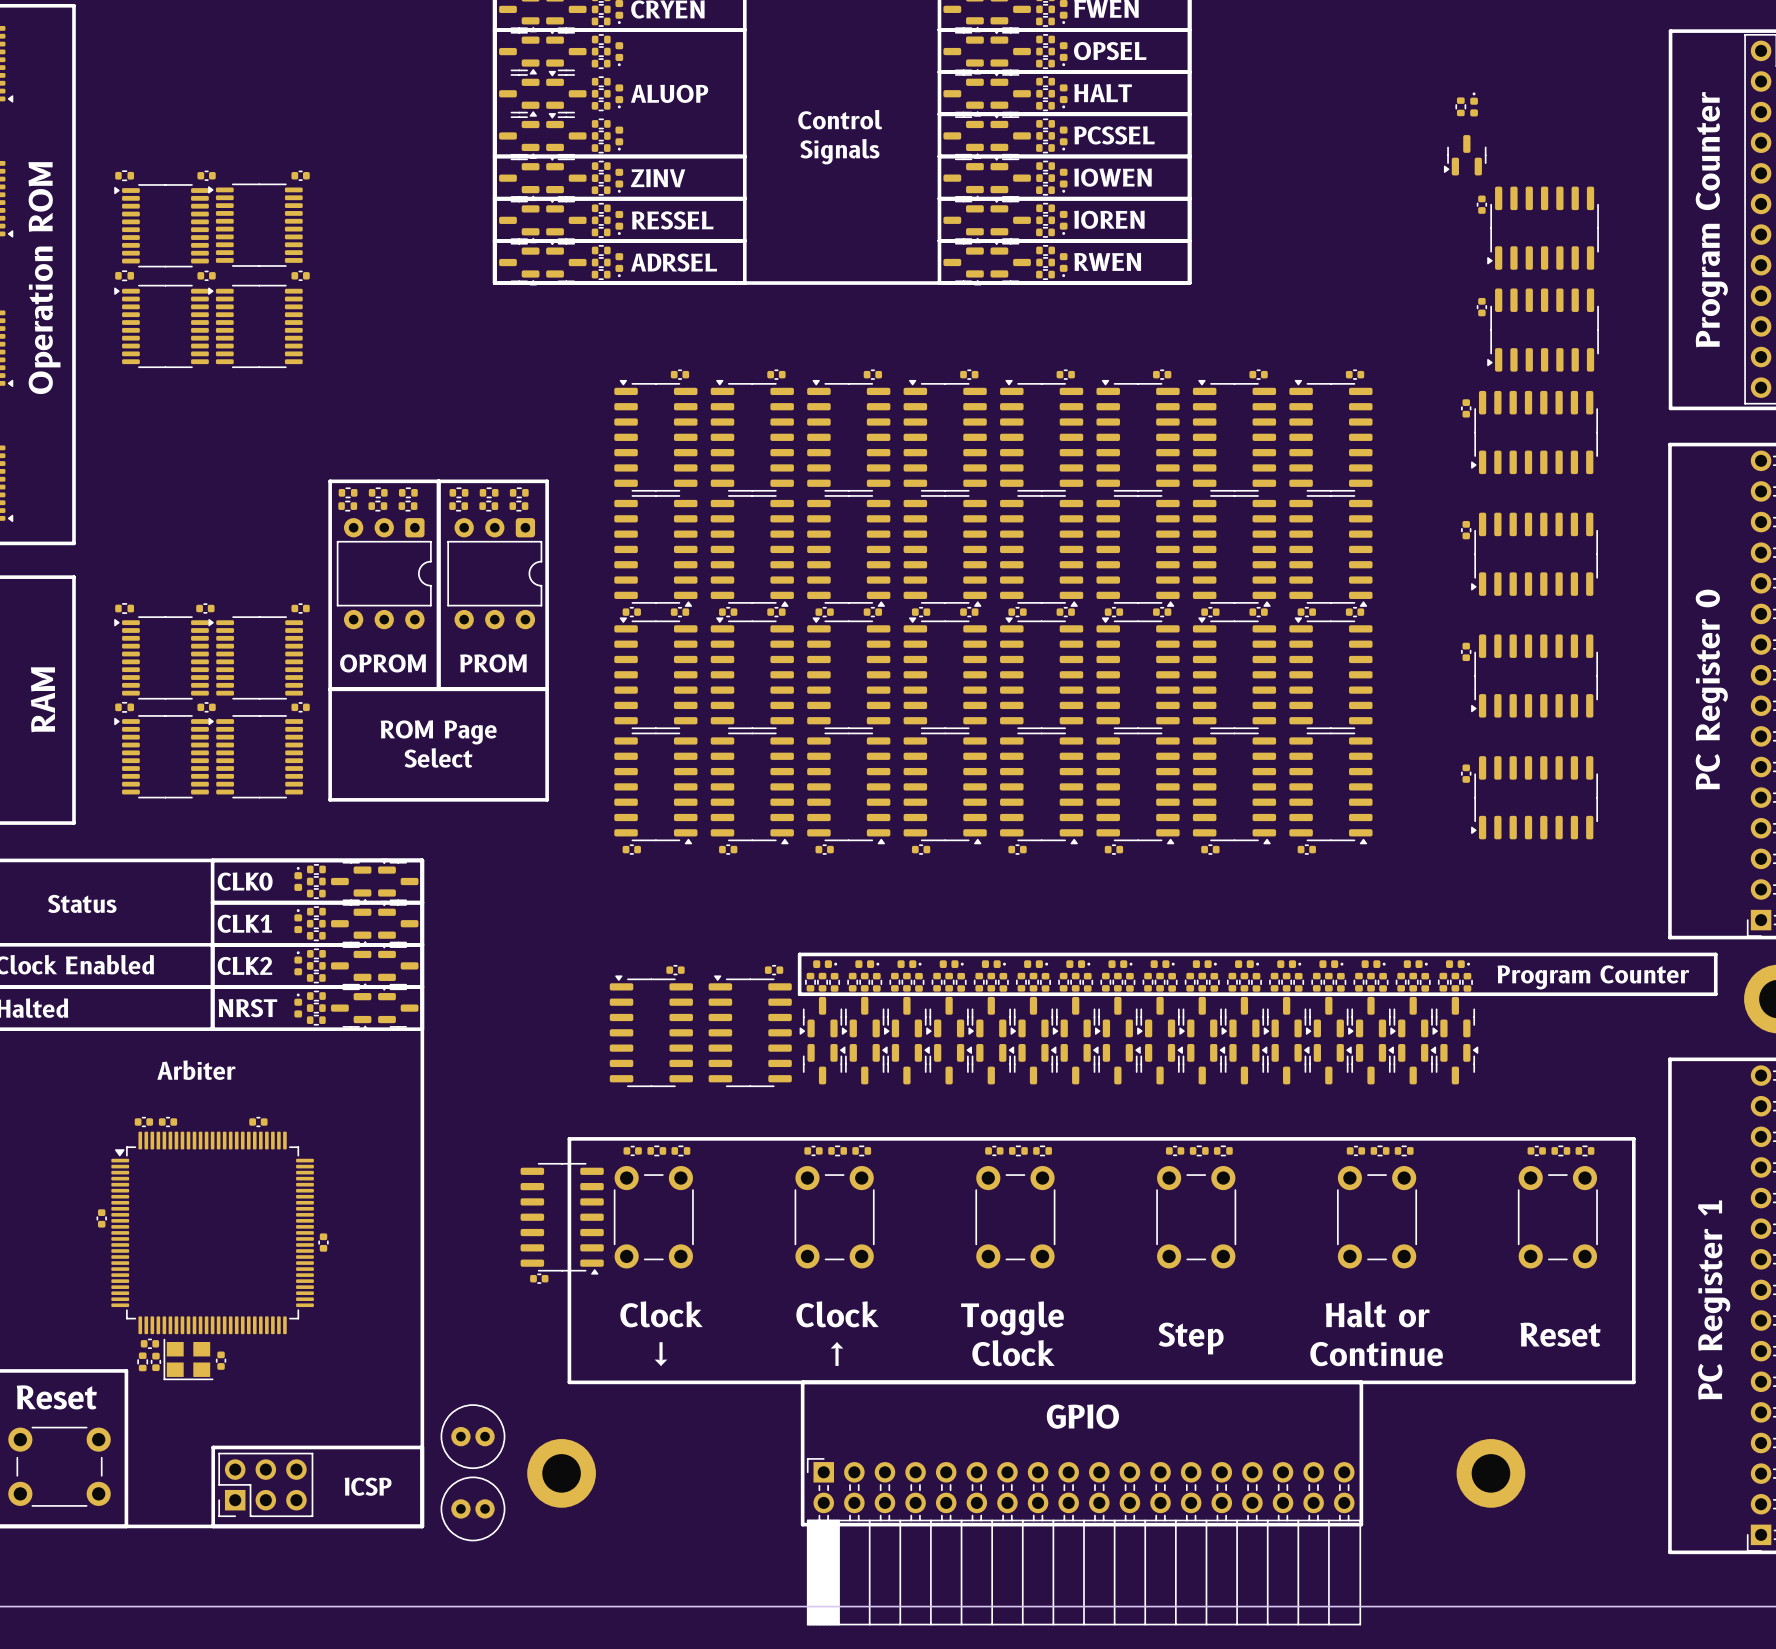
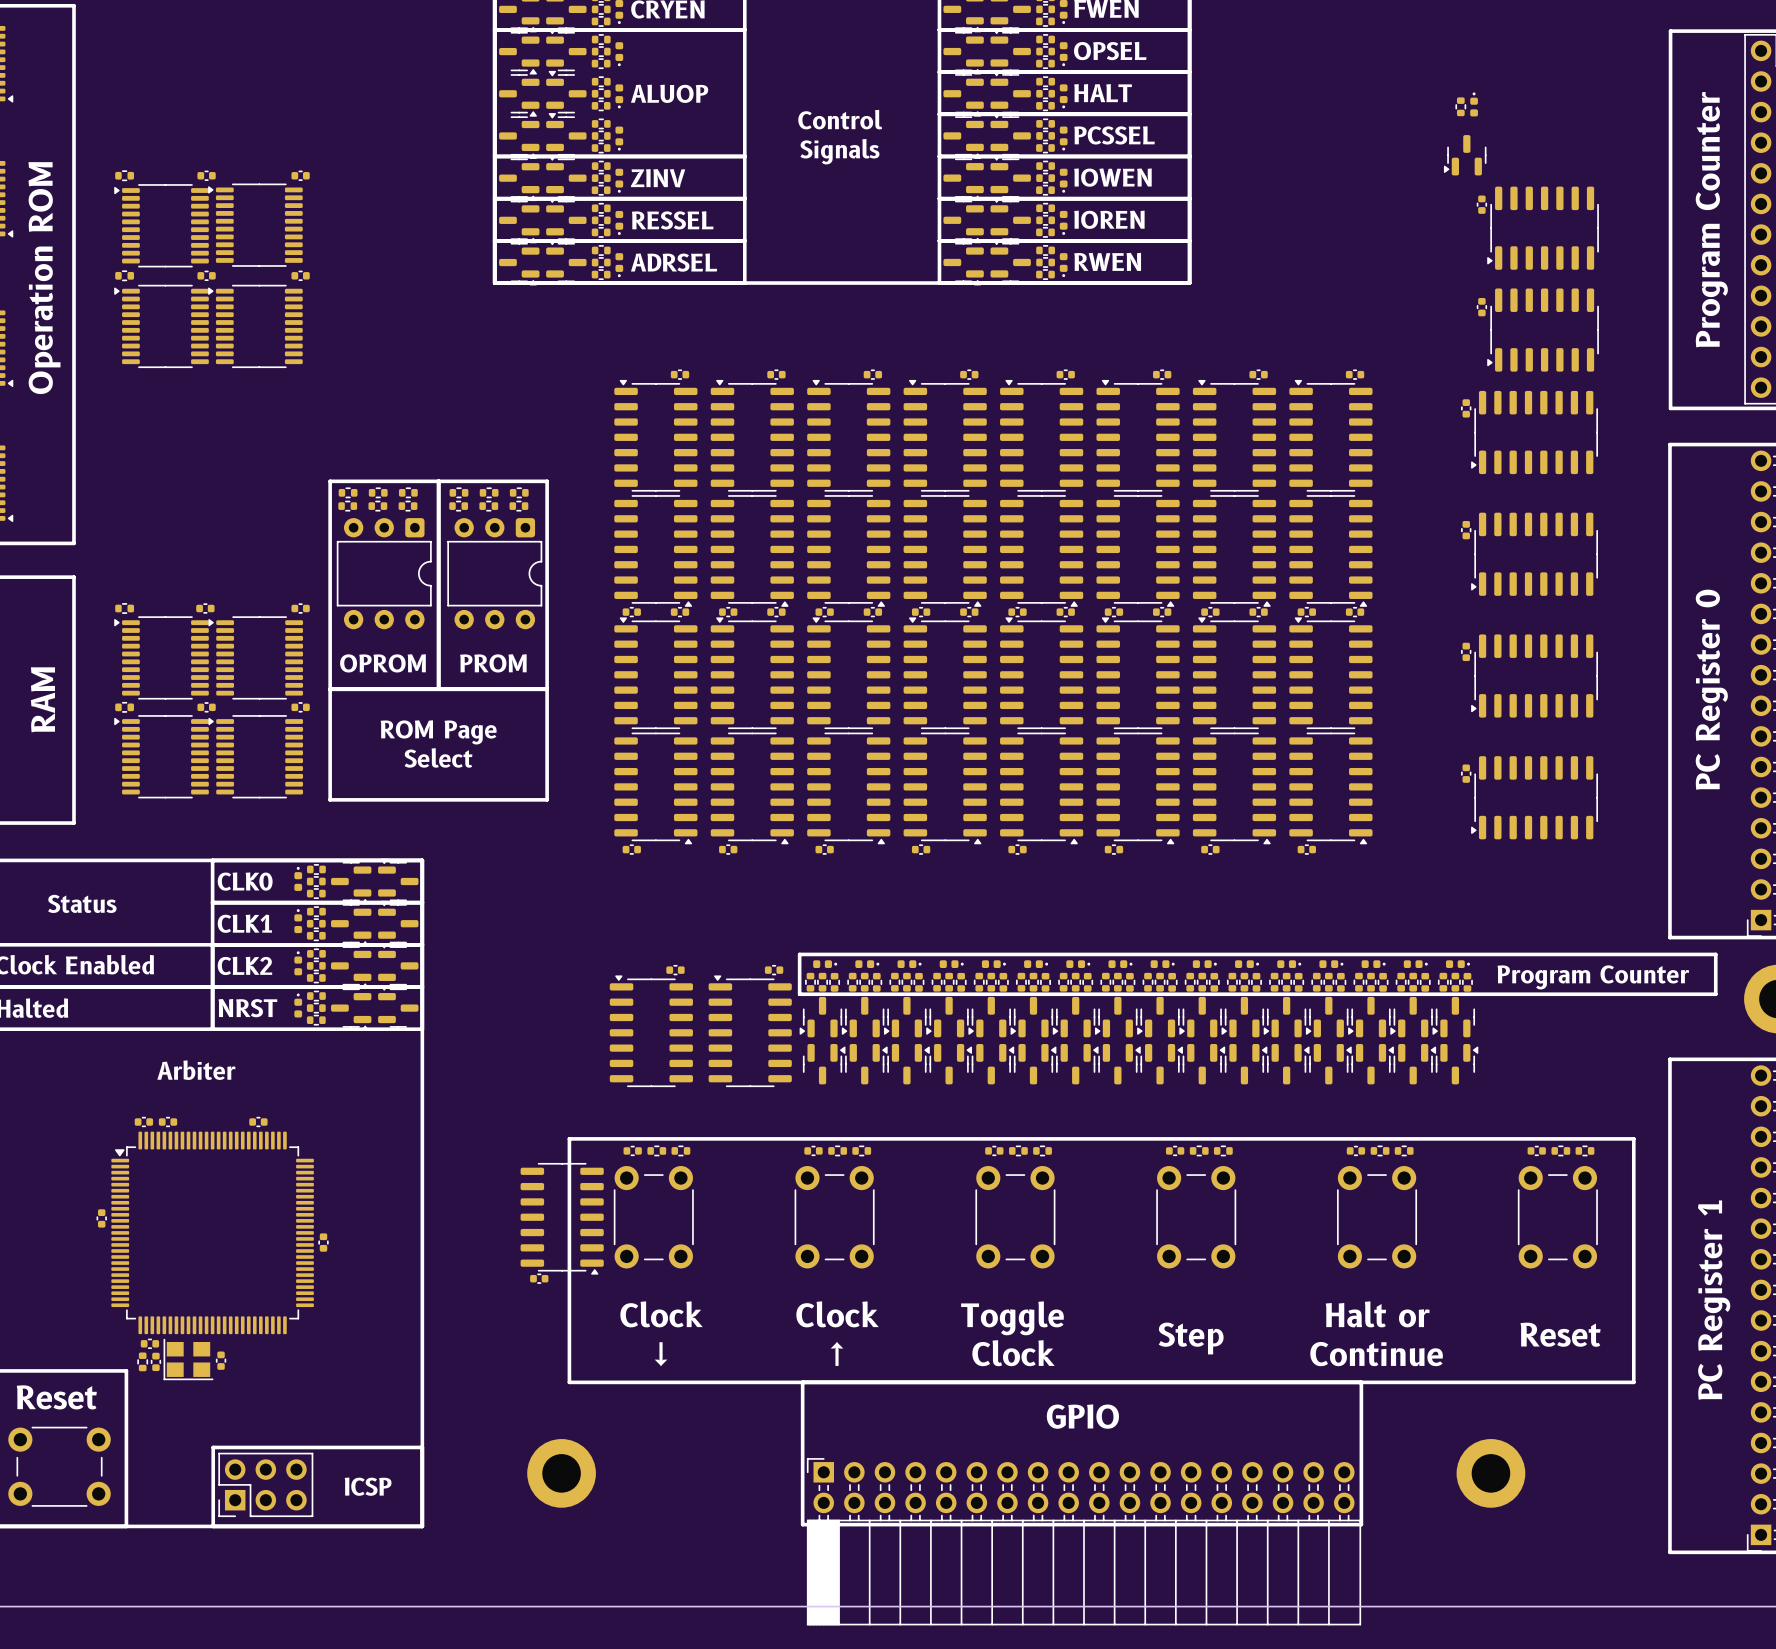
part: (472, 1436) -> none
part: (472, 1508) -> none

